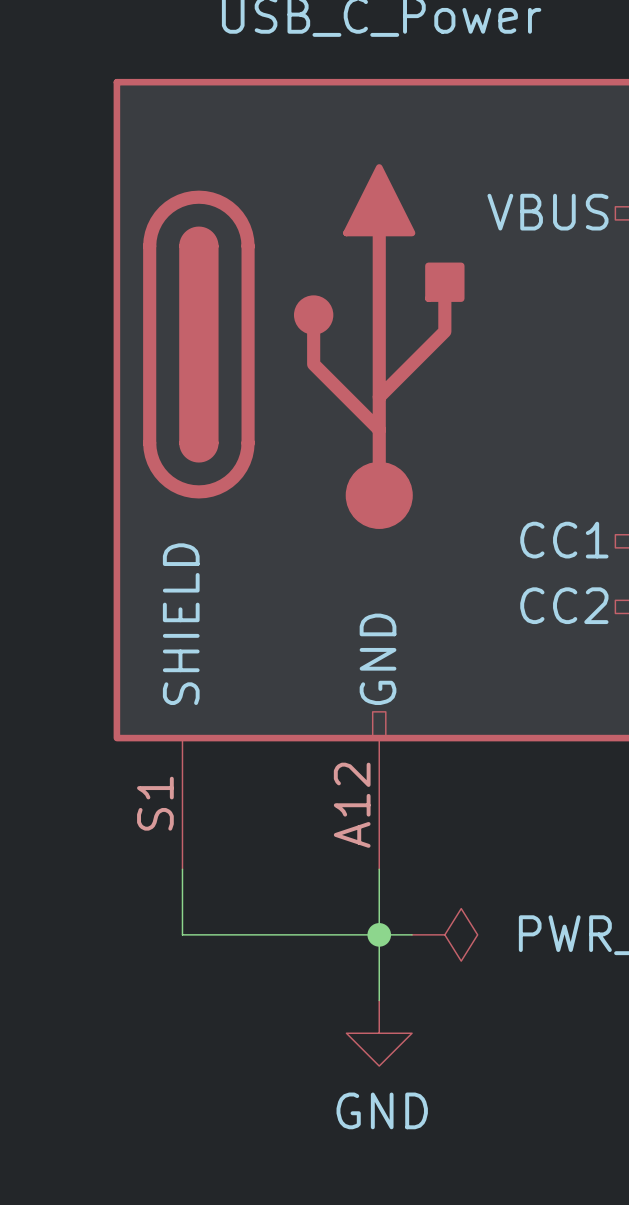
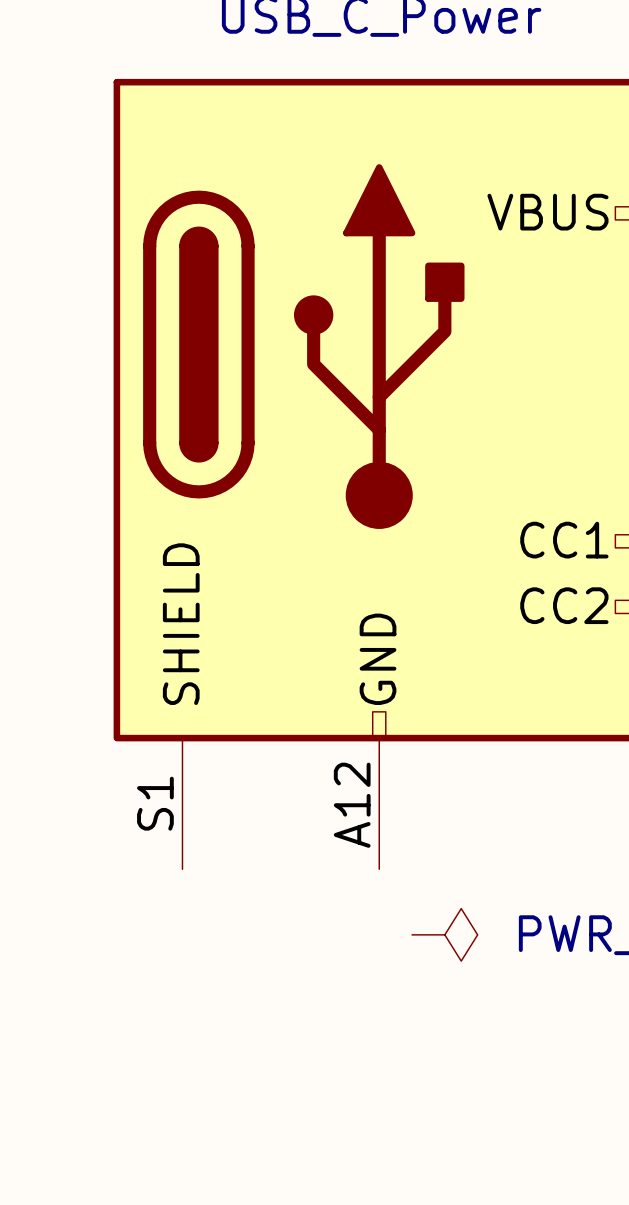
wire: (182, 869) (182, 934) (412, 934) -> none
wire: (379, 869) (379, 1000) -> none
junction: (379, 934) -> none
power symbol: GND (379, 1033) -> none

